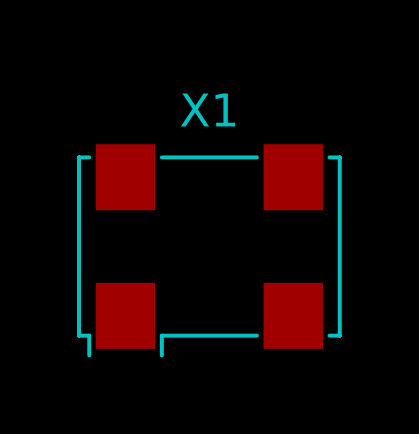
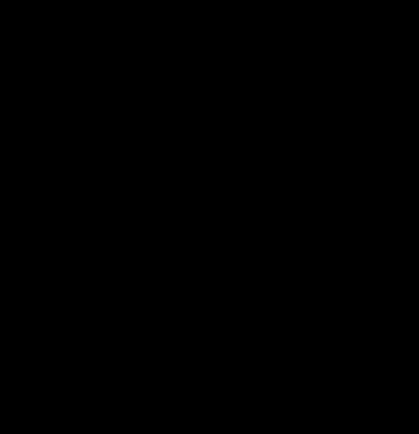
X1: (209, 250) -> none

